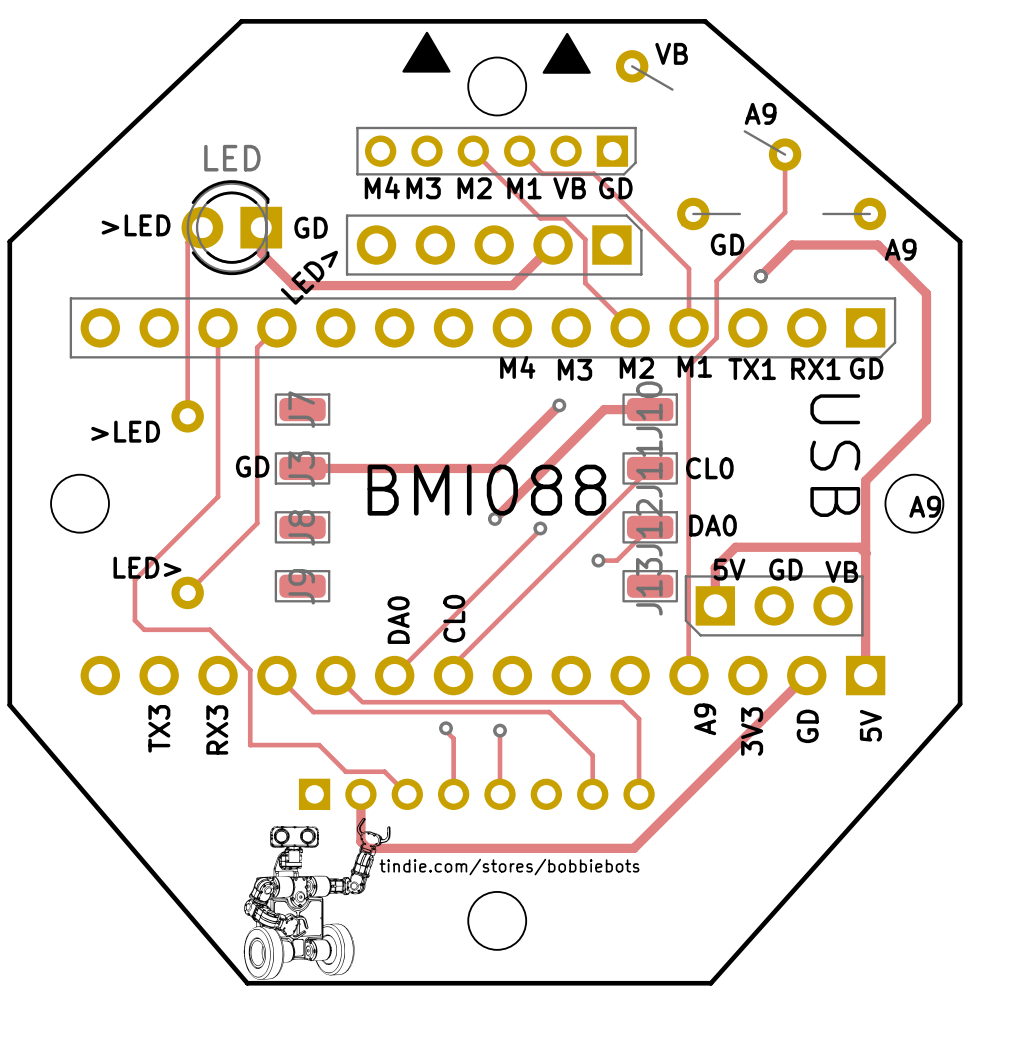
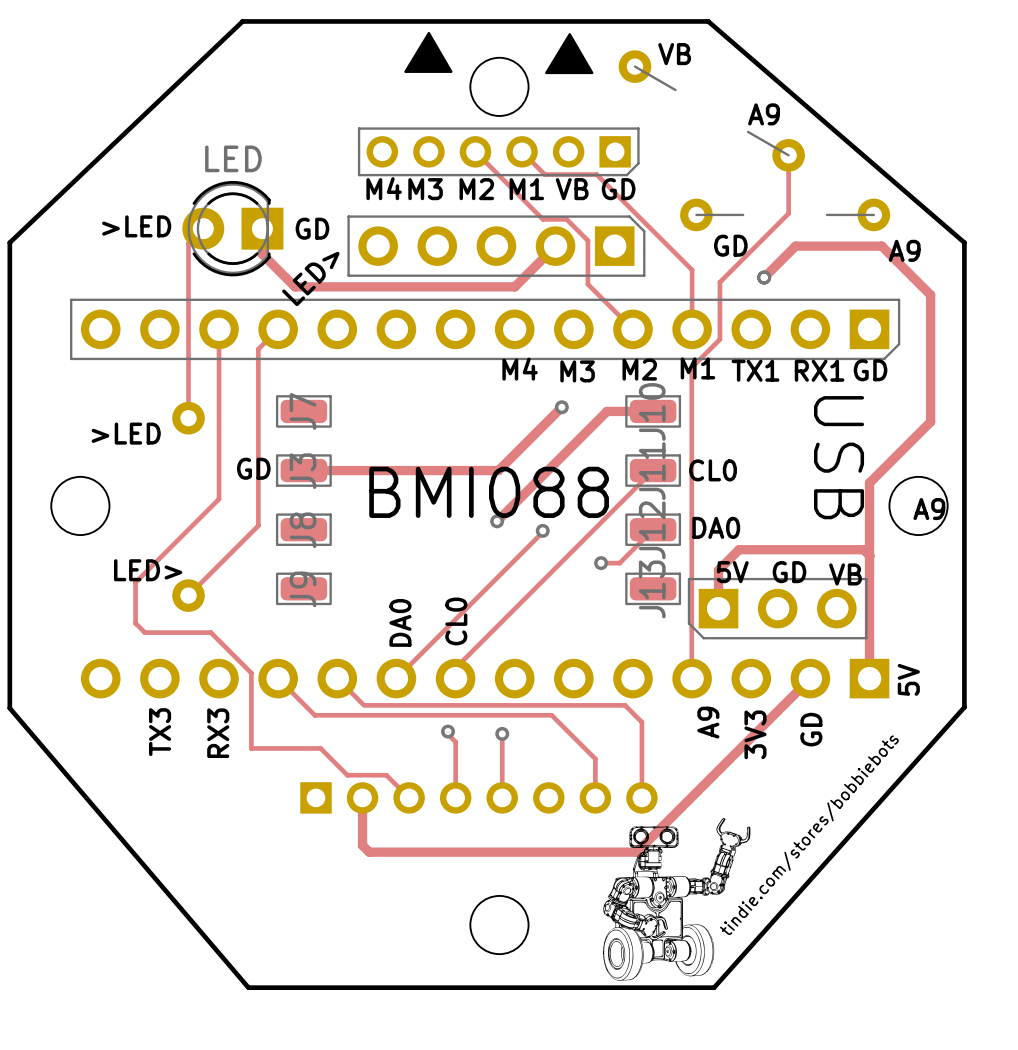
text position: 5V (870, 725) -> 5V (908, 679)
text rotation: 0° (509, 867) -> 49° counterclockwise (809, 835)
drawing position: (317, 898) -> (676, 899)

